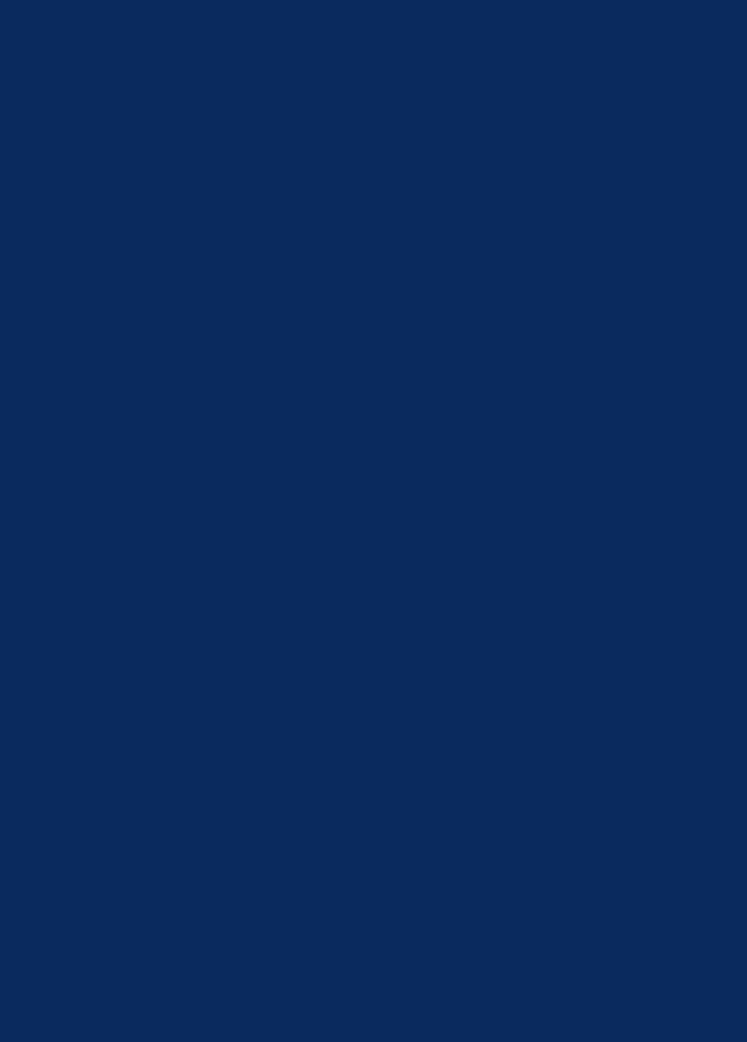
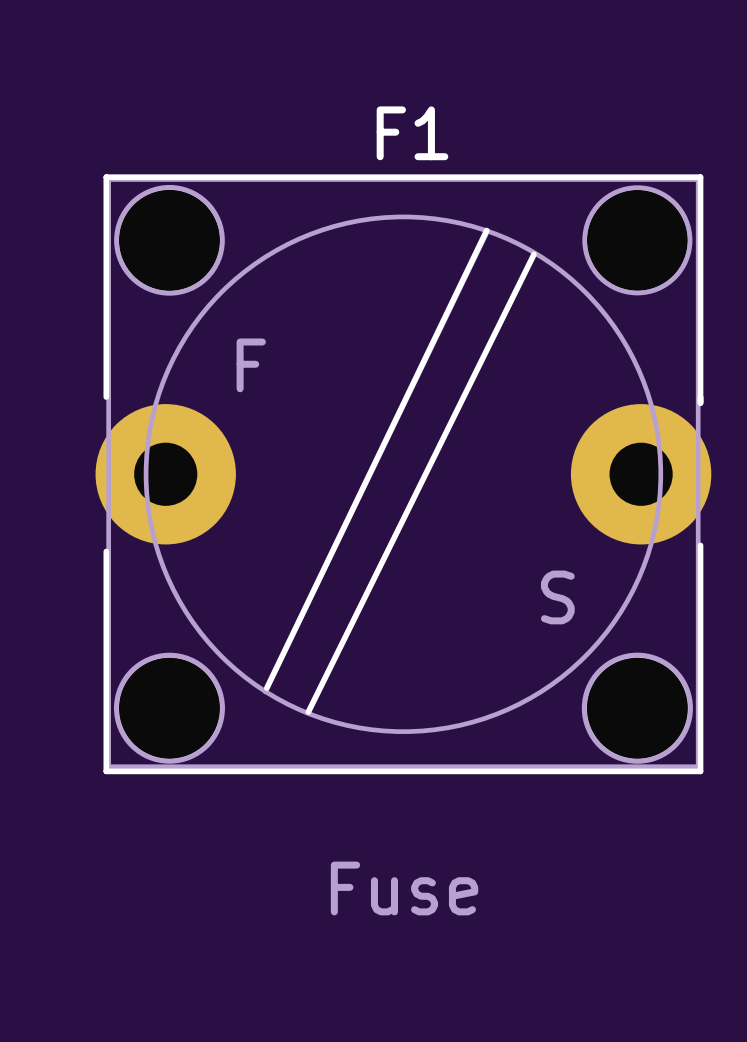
F1: none -> Fuse (403, 474)

